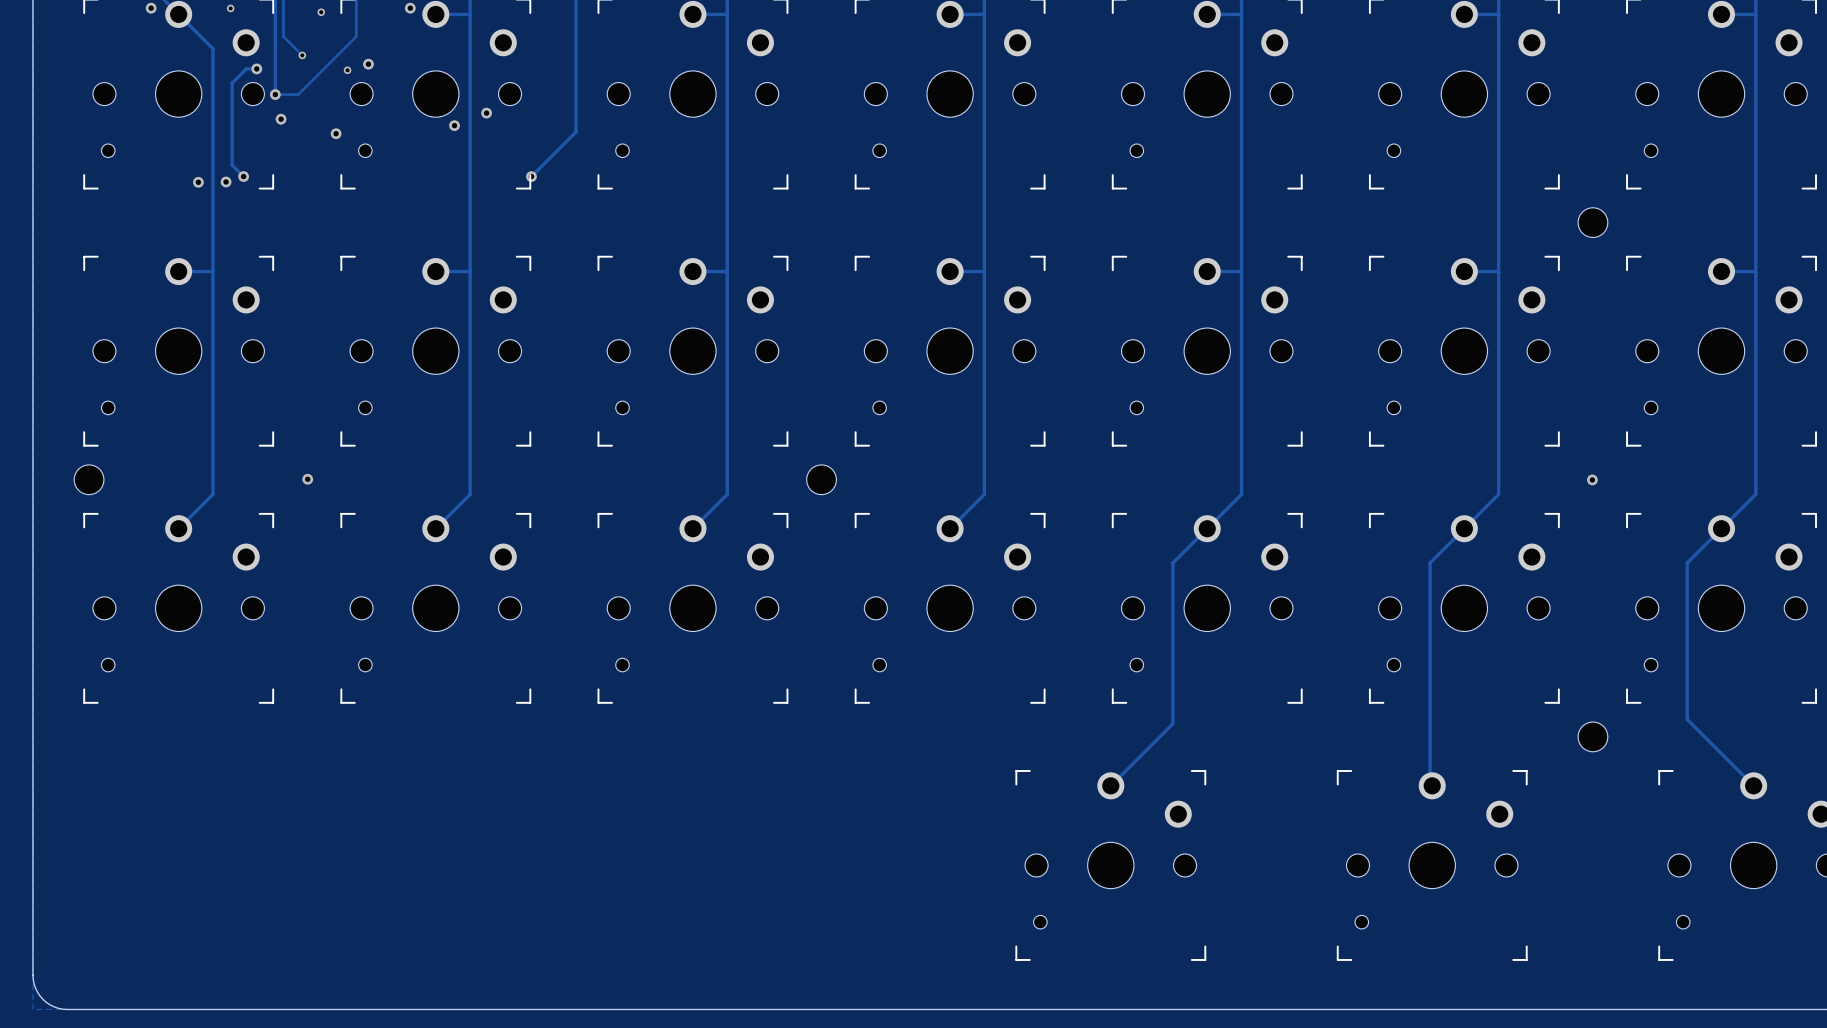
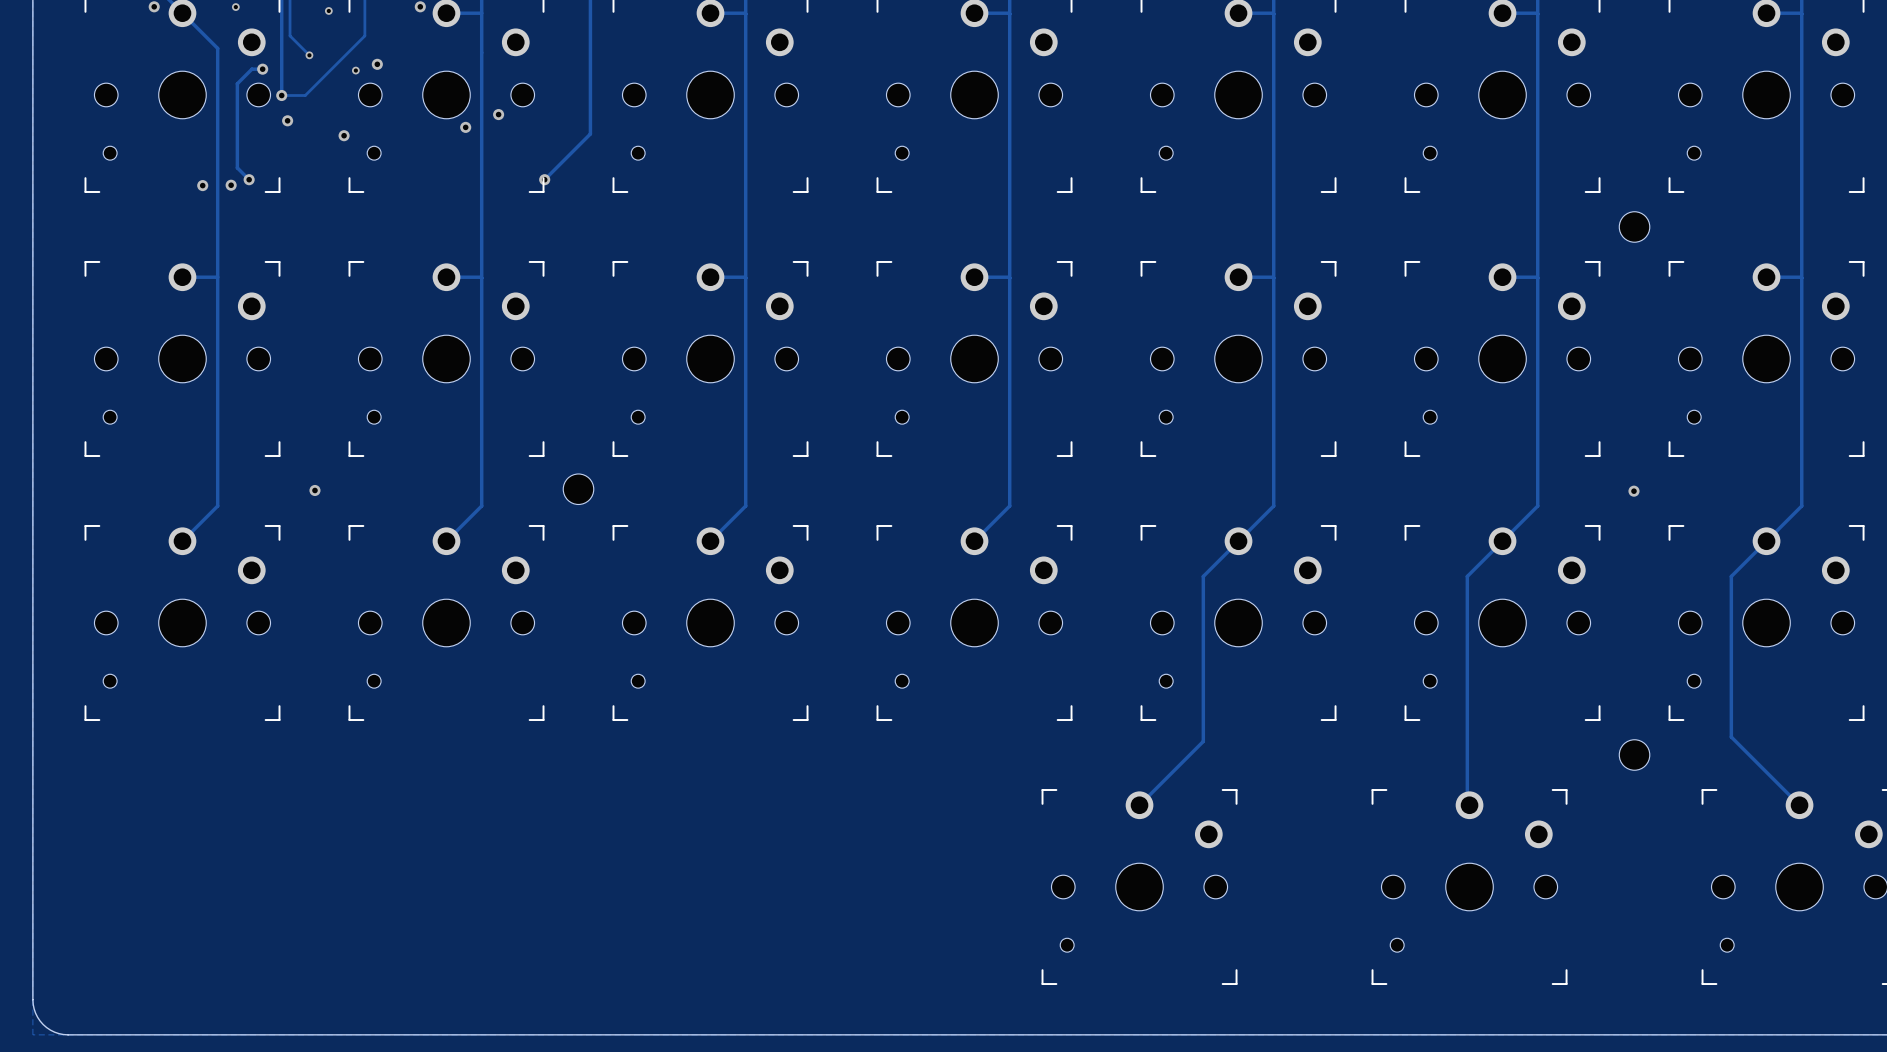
part: none -> (578, 489)
part: (89, 479) -> none
part: (821, 479) -> none

